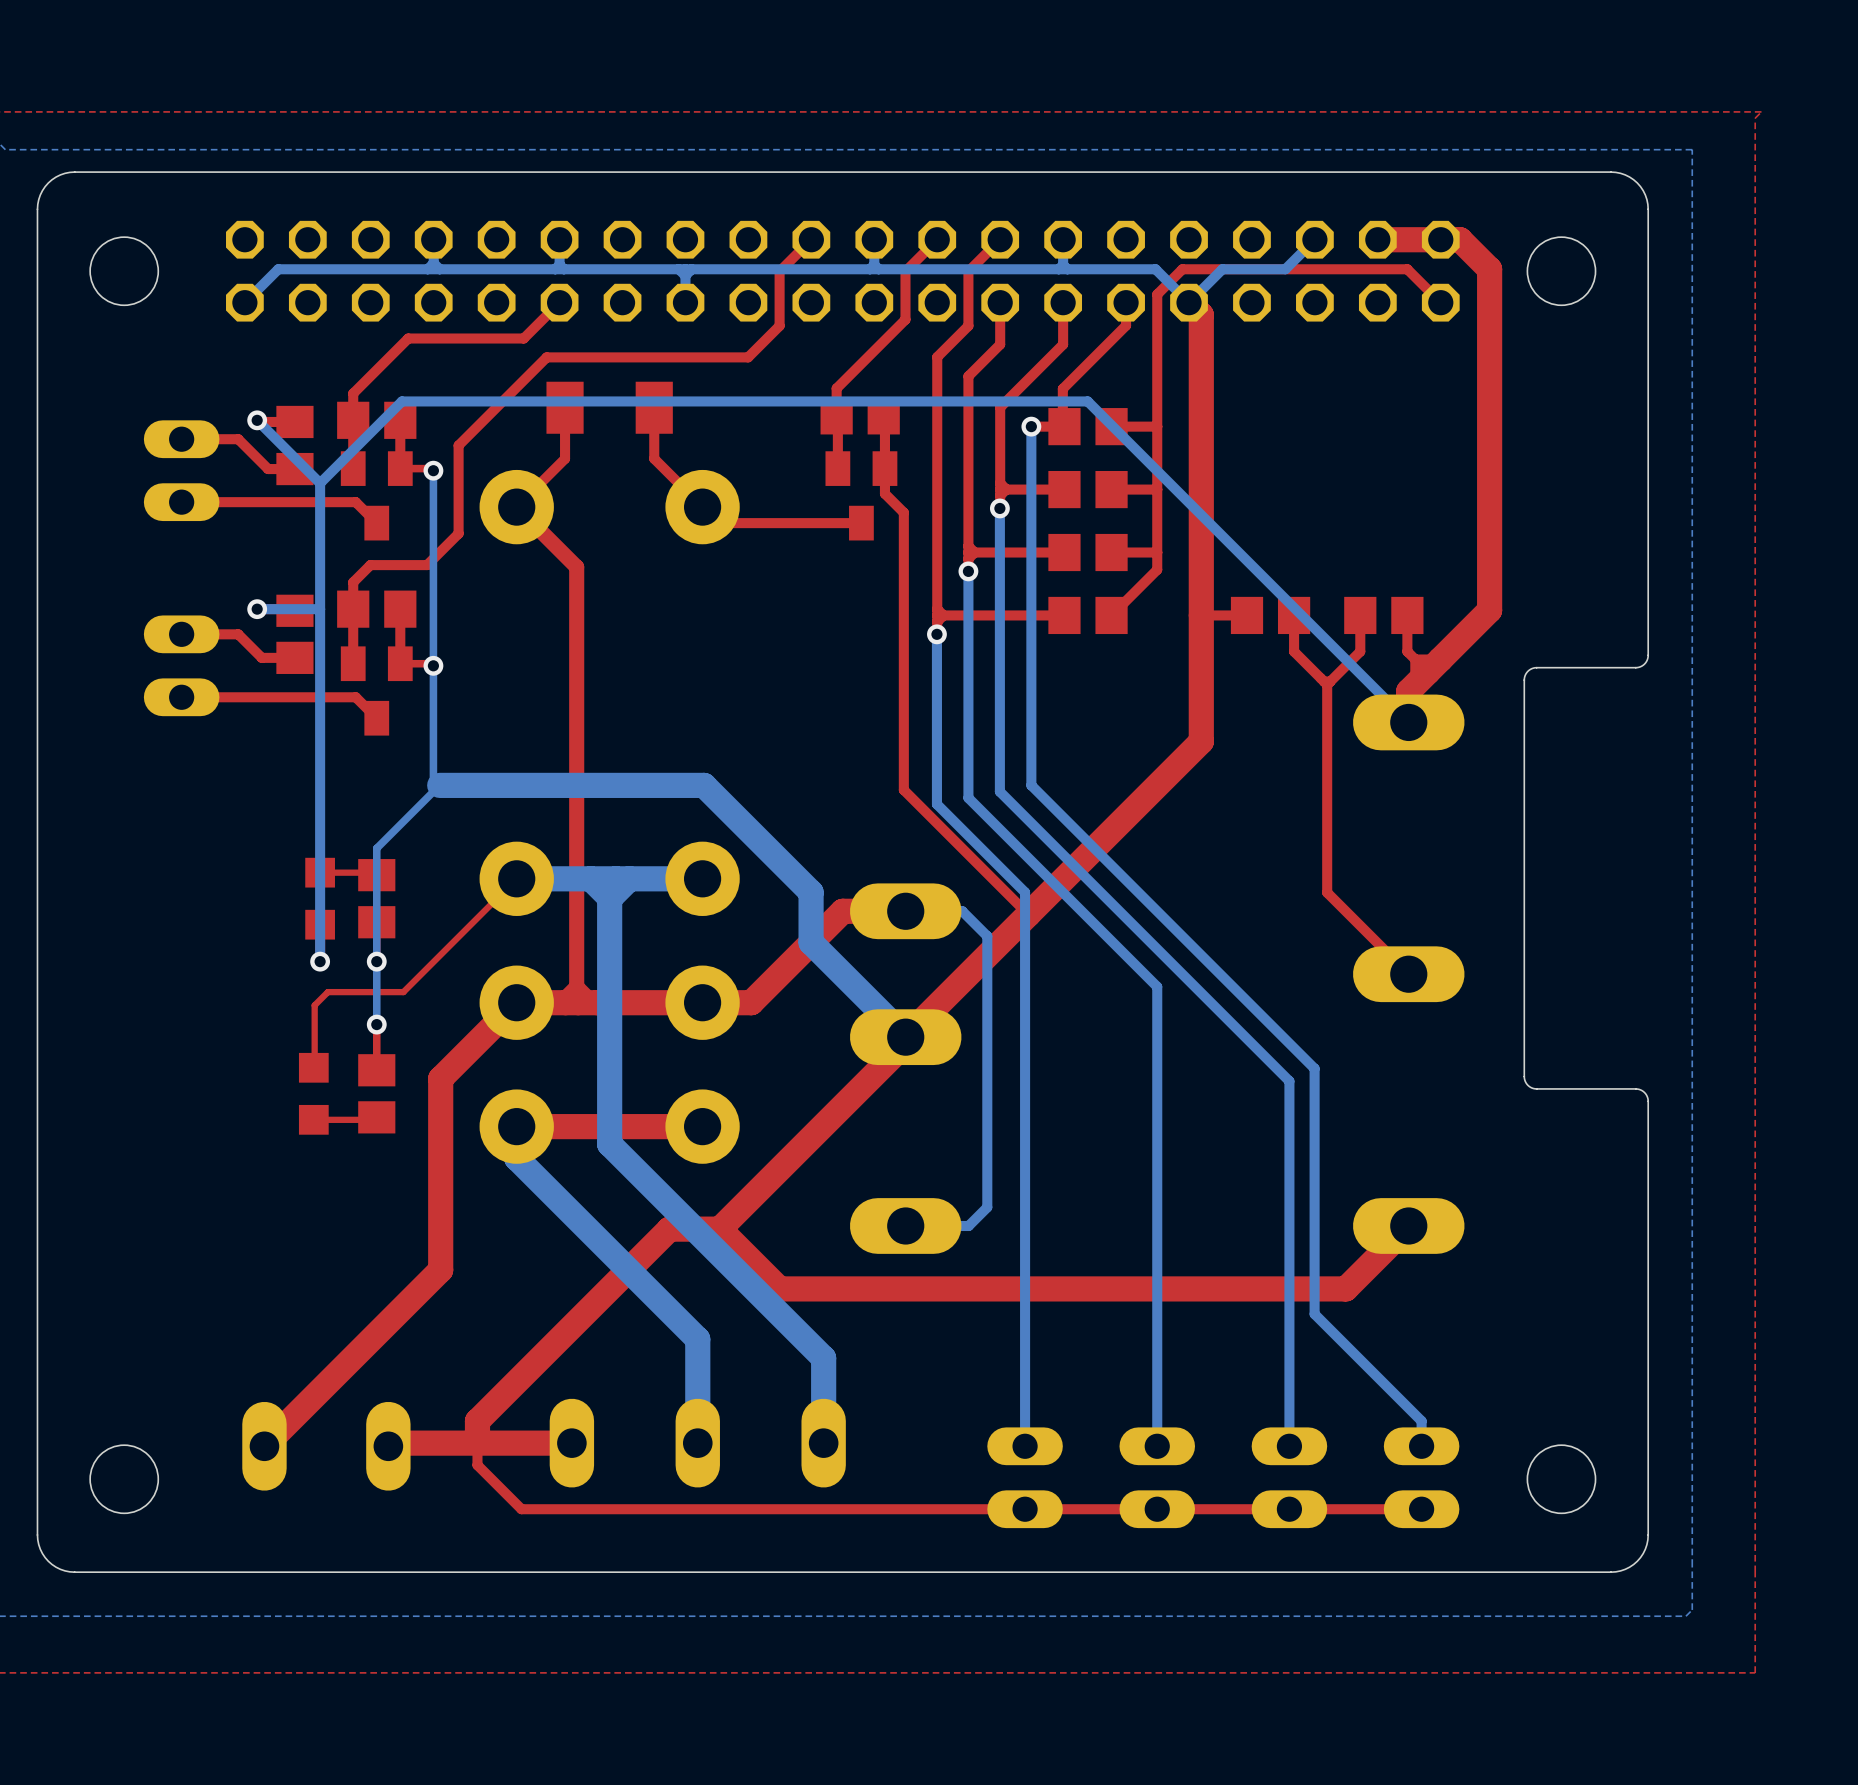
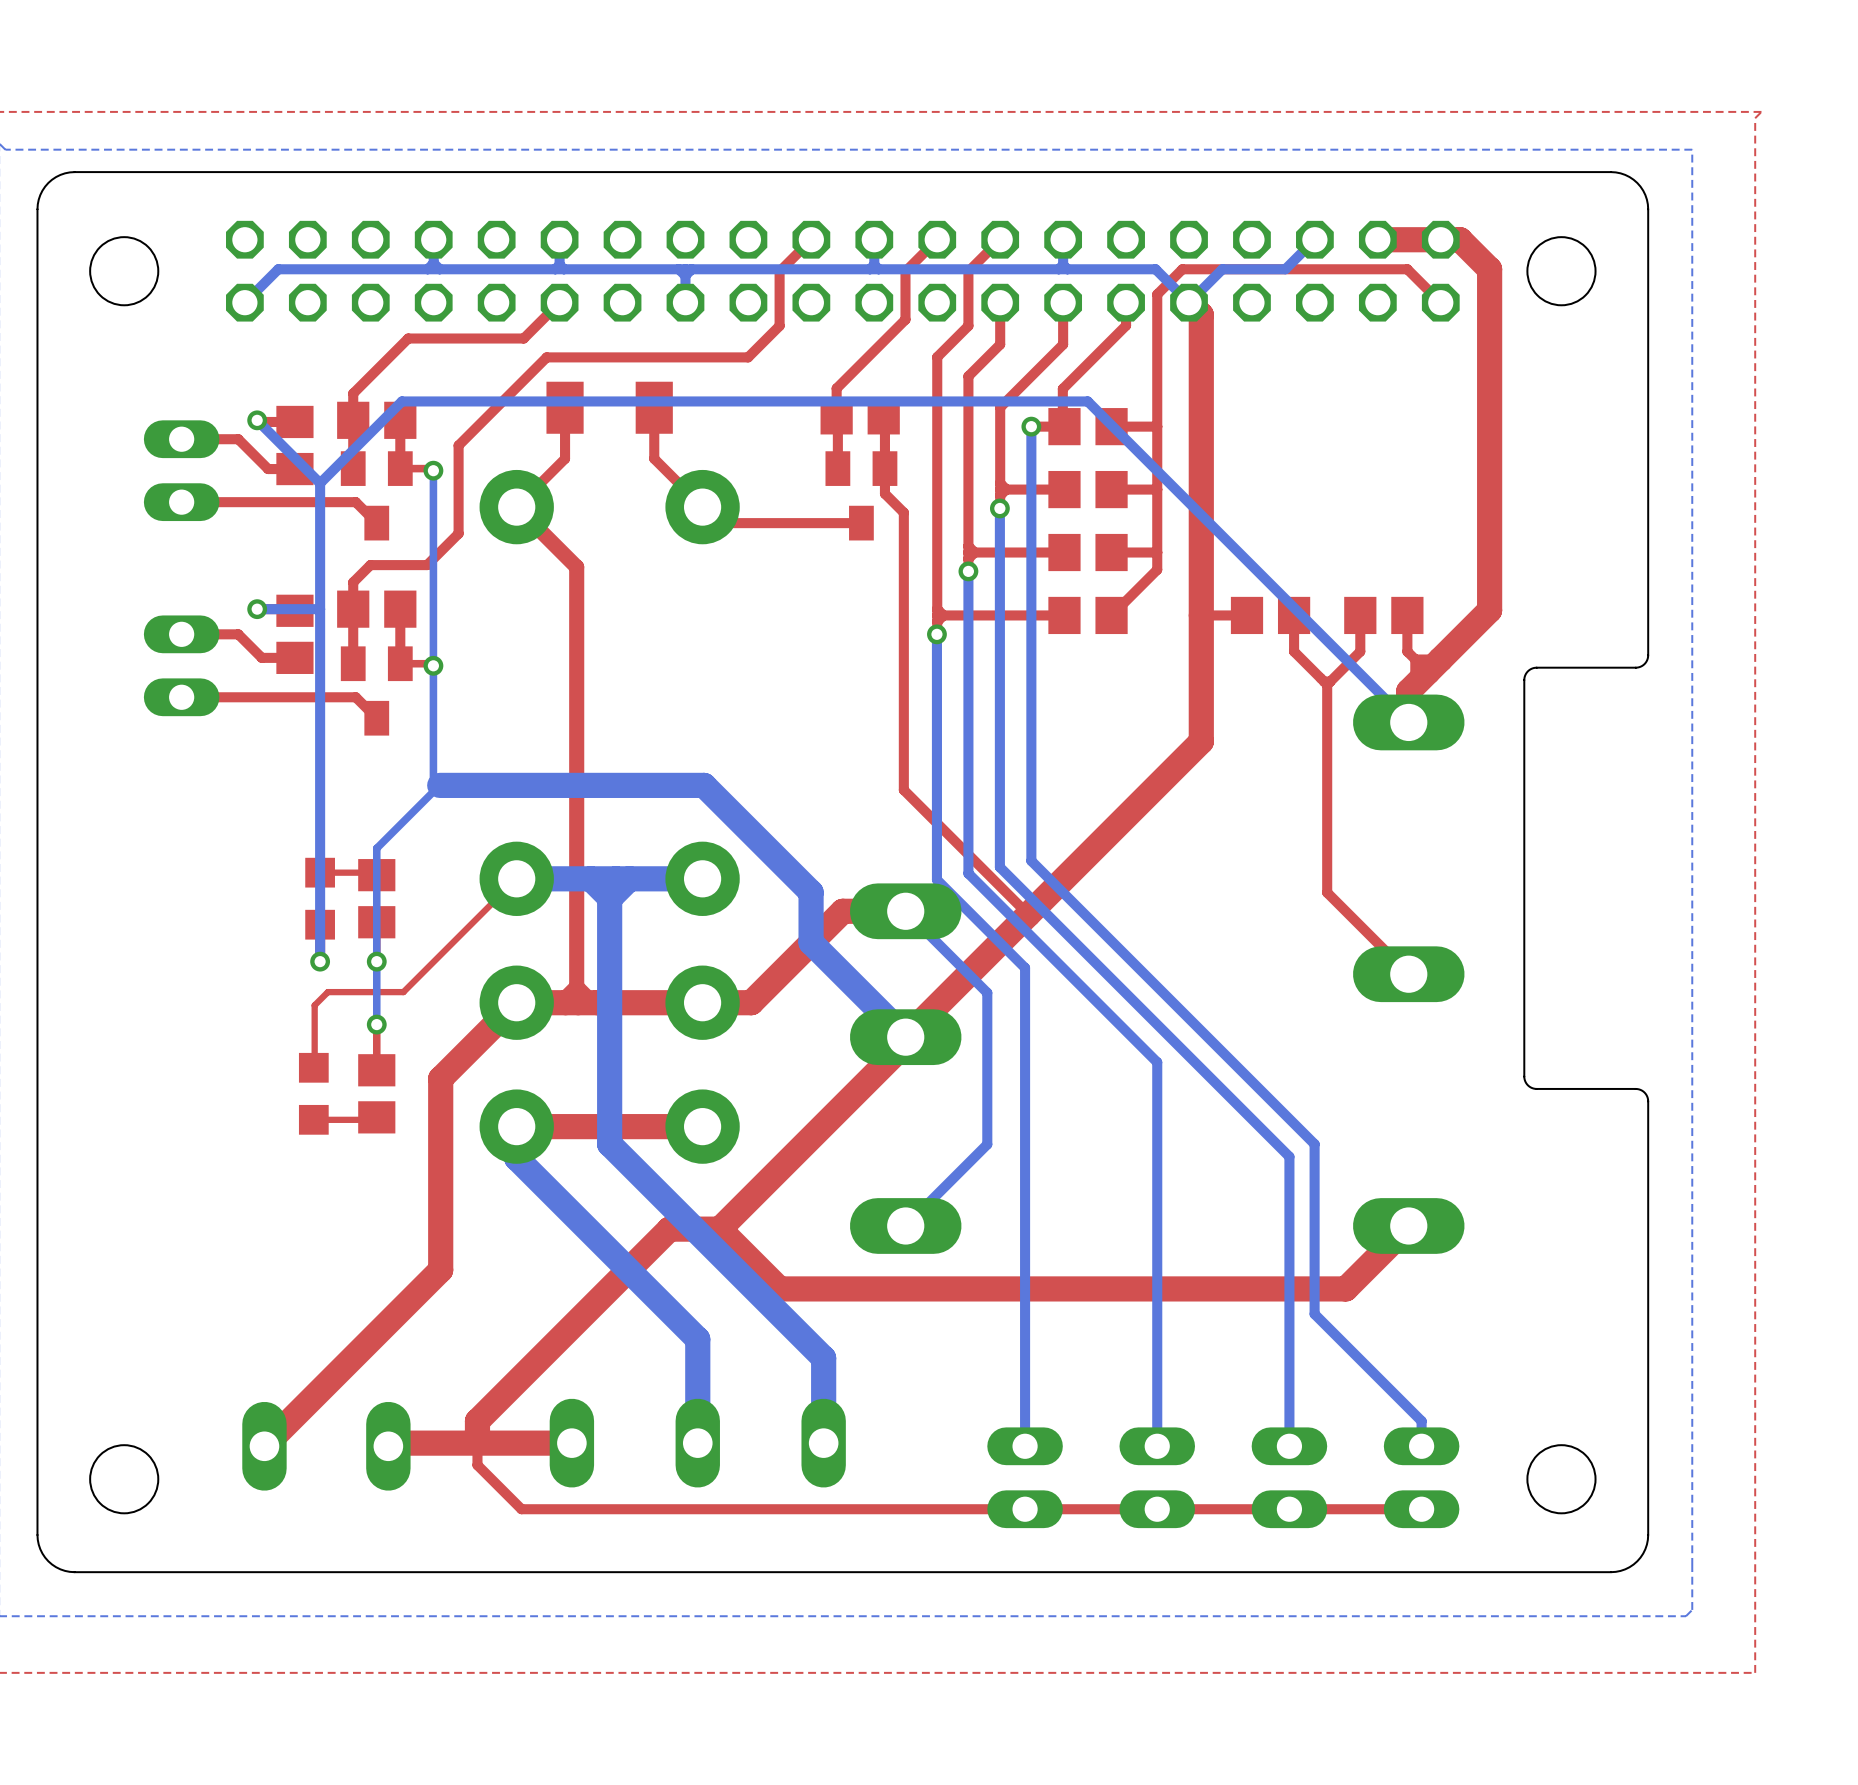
bottom track: (1031, 785) (1314, 1068) (1314, 1144) -> none
bottom track: (999, 791) (1289, 1081) (1289, 1156) -> (1025, 892) (1289, 1156)
bottom track: (968, 797) (1031, 860) -> (1031, 785) (1031, 860)
bottom track: none -> (968, 797) (968, 873) (1157, 1062)
bottom track: (936, 804) (999, 867) -> (999, 791) (999, 867)
bottom track: (1025, 892) (1025, 967) -> (936, 804) (936, 879) (1025, 967)
bottom track: (905, 911) (962, 911) (987, 936) (987, 992) -> (905, 911) (987, 992)
bottom track: (1157, 986) (1157, 1062) -> (1157, 986) (1314, 1144)
bottom track: (987, 1144) (987, 1207) (968, 1225) (905, 1225) -> (987, 1144) (905, 1225)

